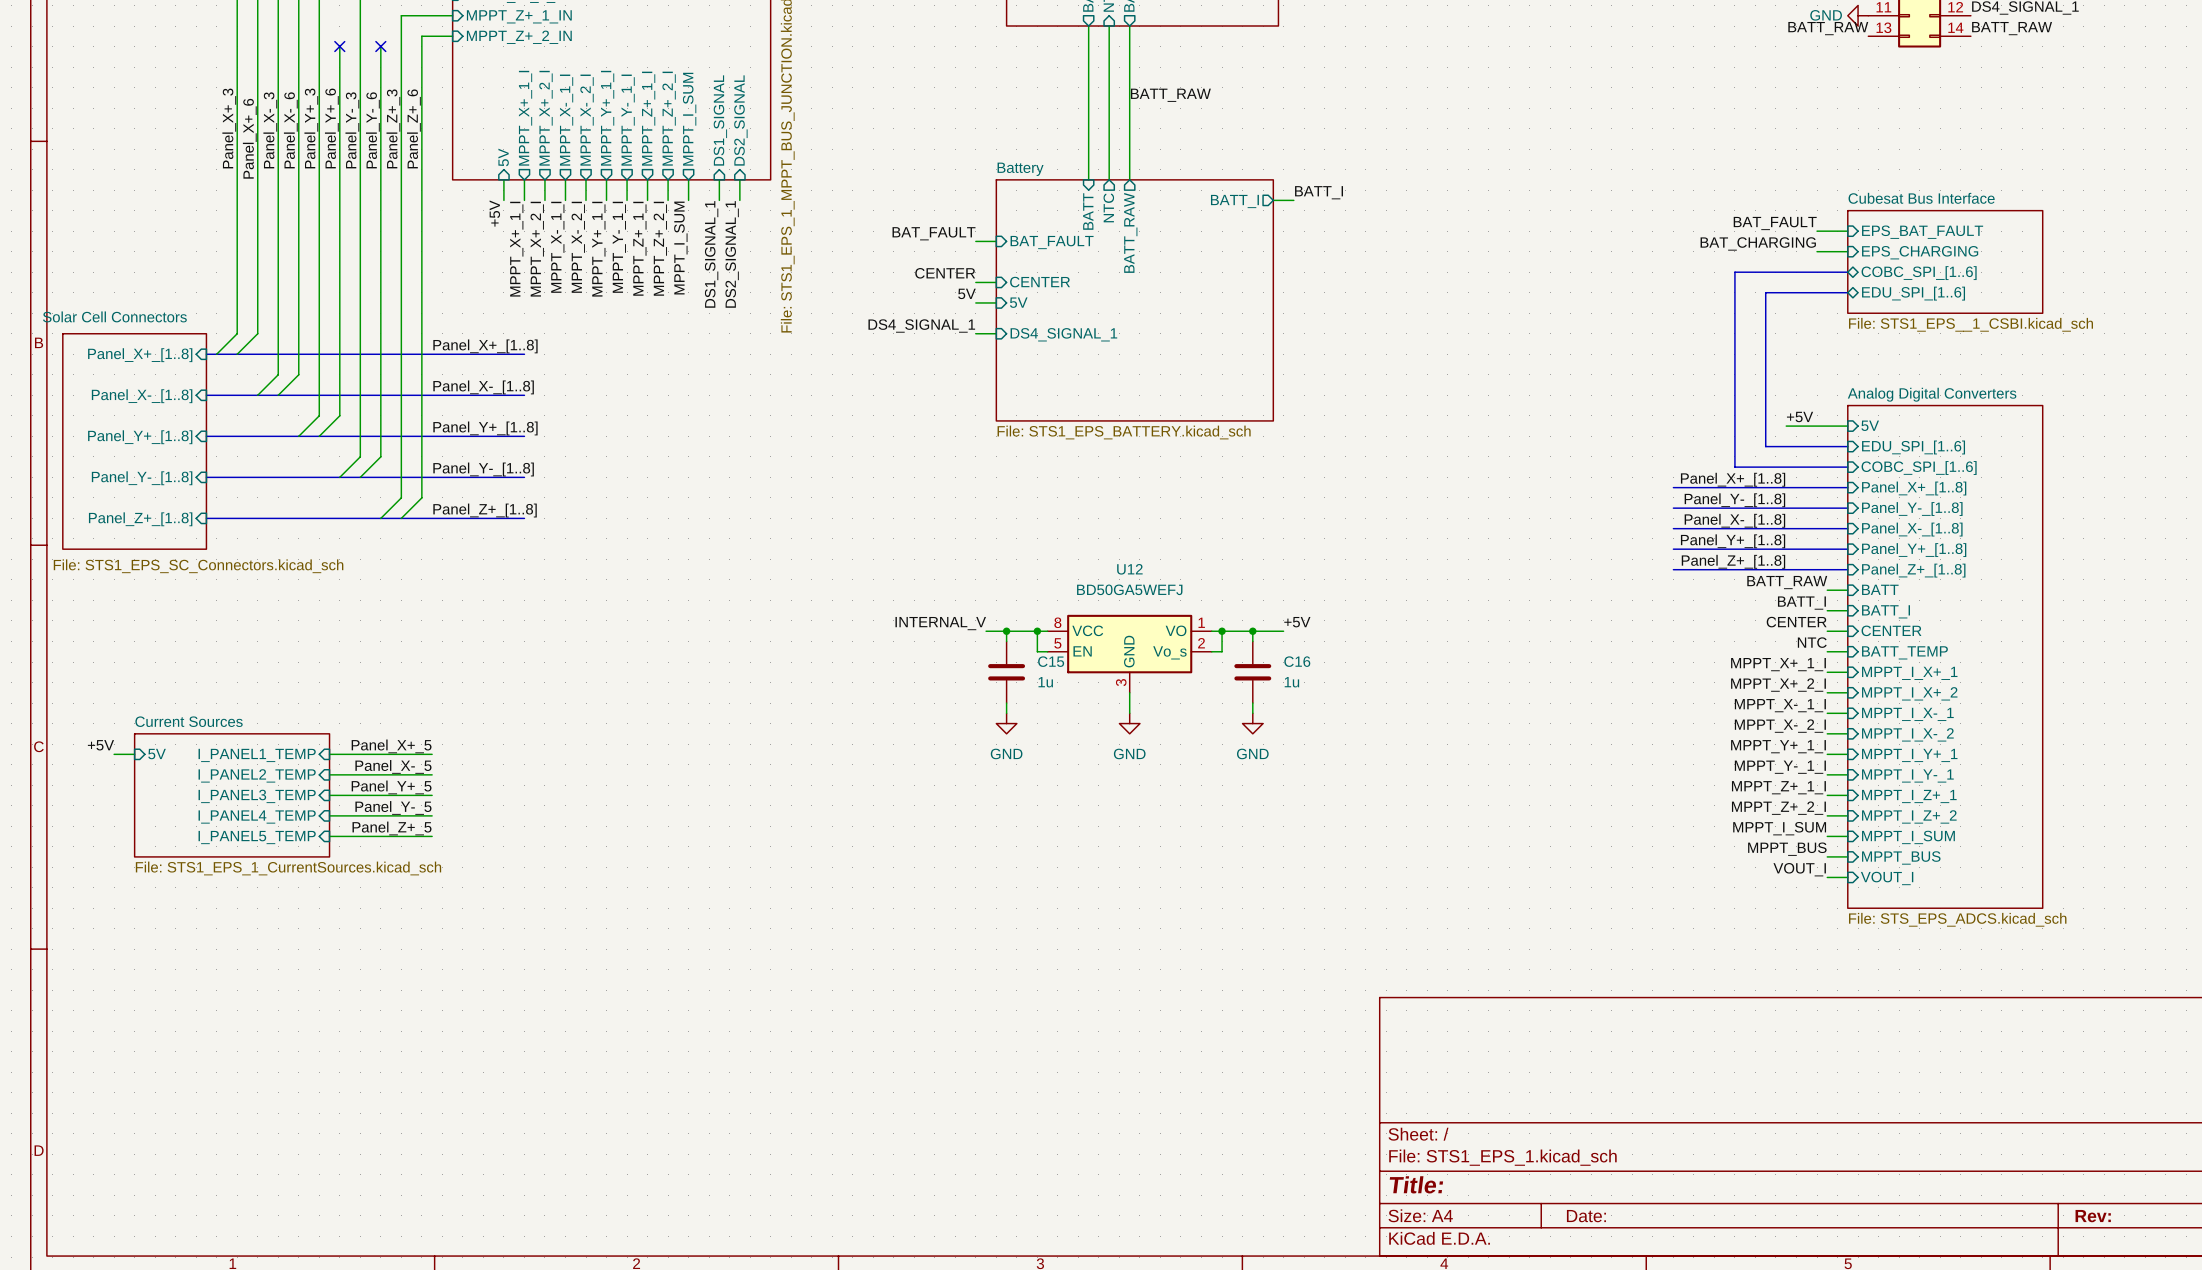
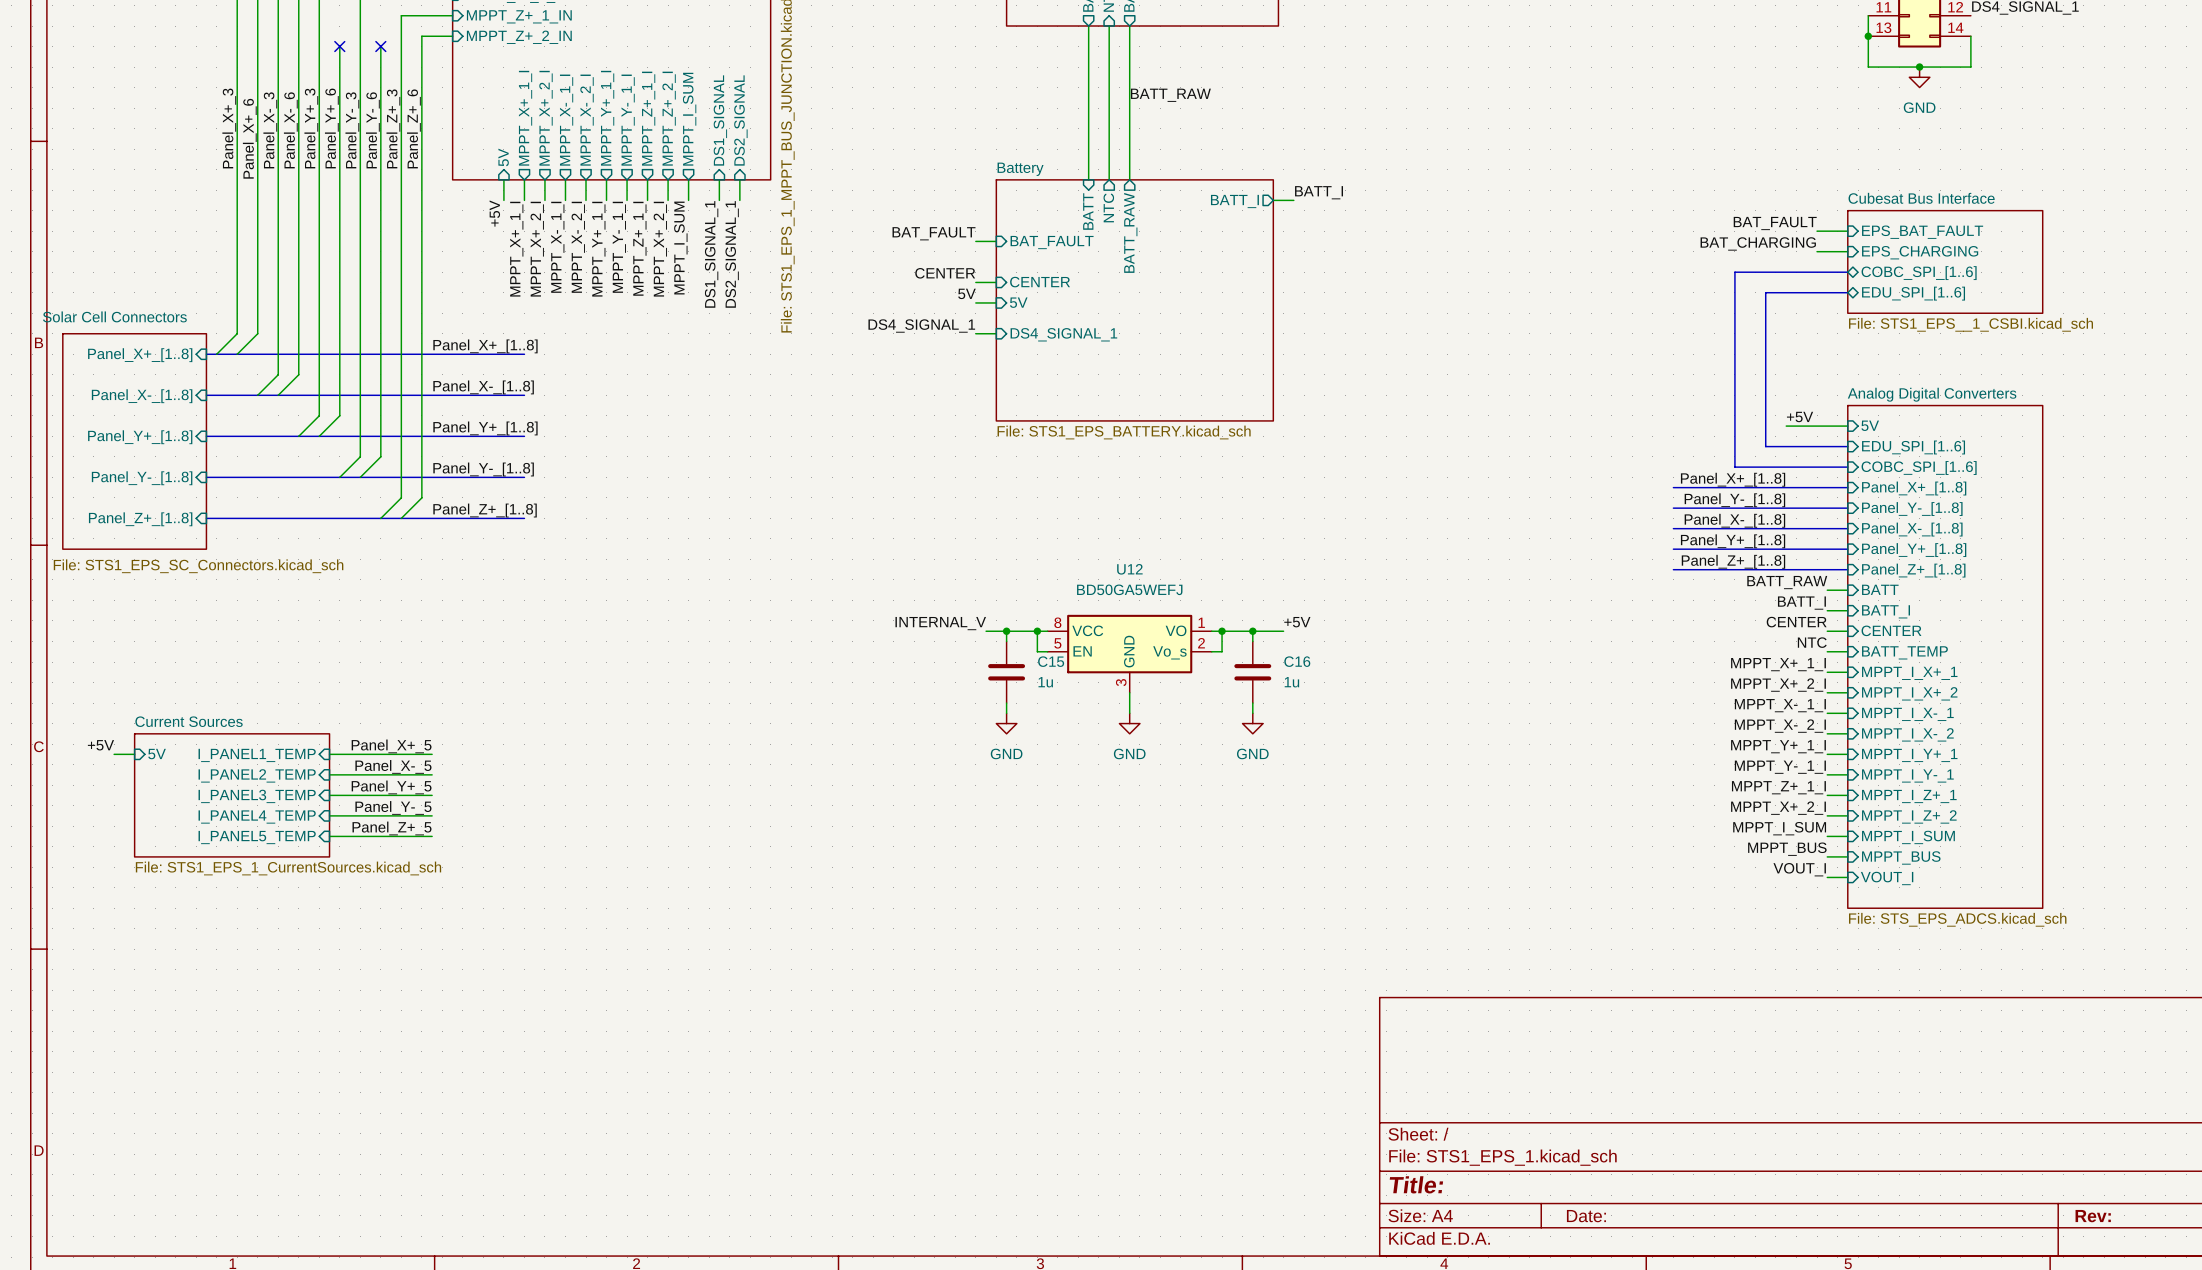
power symbol rotation: 0° (1858, 15) -> 90° counterclockwise (1919, 77)
power symbol position: GND (1858, 15) -> GND (1919, 77)
wire: none -> (1868, 15) (1868, 67) (1970, 67) (1970, 36)
label: BATT_RAW (1828, 28) -> none
label: BATT_RAW (2012, 28) -> none
junction: none -> (1868, 36)
junction: none -> (1919, 67)
label: MPPT_Z+_2_I (660, 248) -> MPPT_X+_2_I (660, 249)
label: MPPT_Z+_2_I (1778, 808) -> MPPT_X+_2_I (1778, 808)

